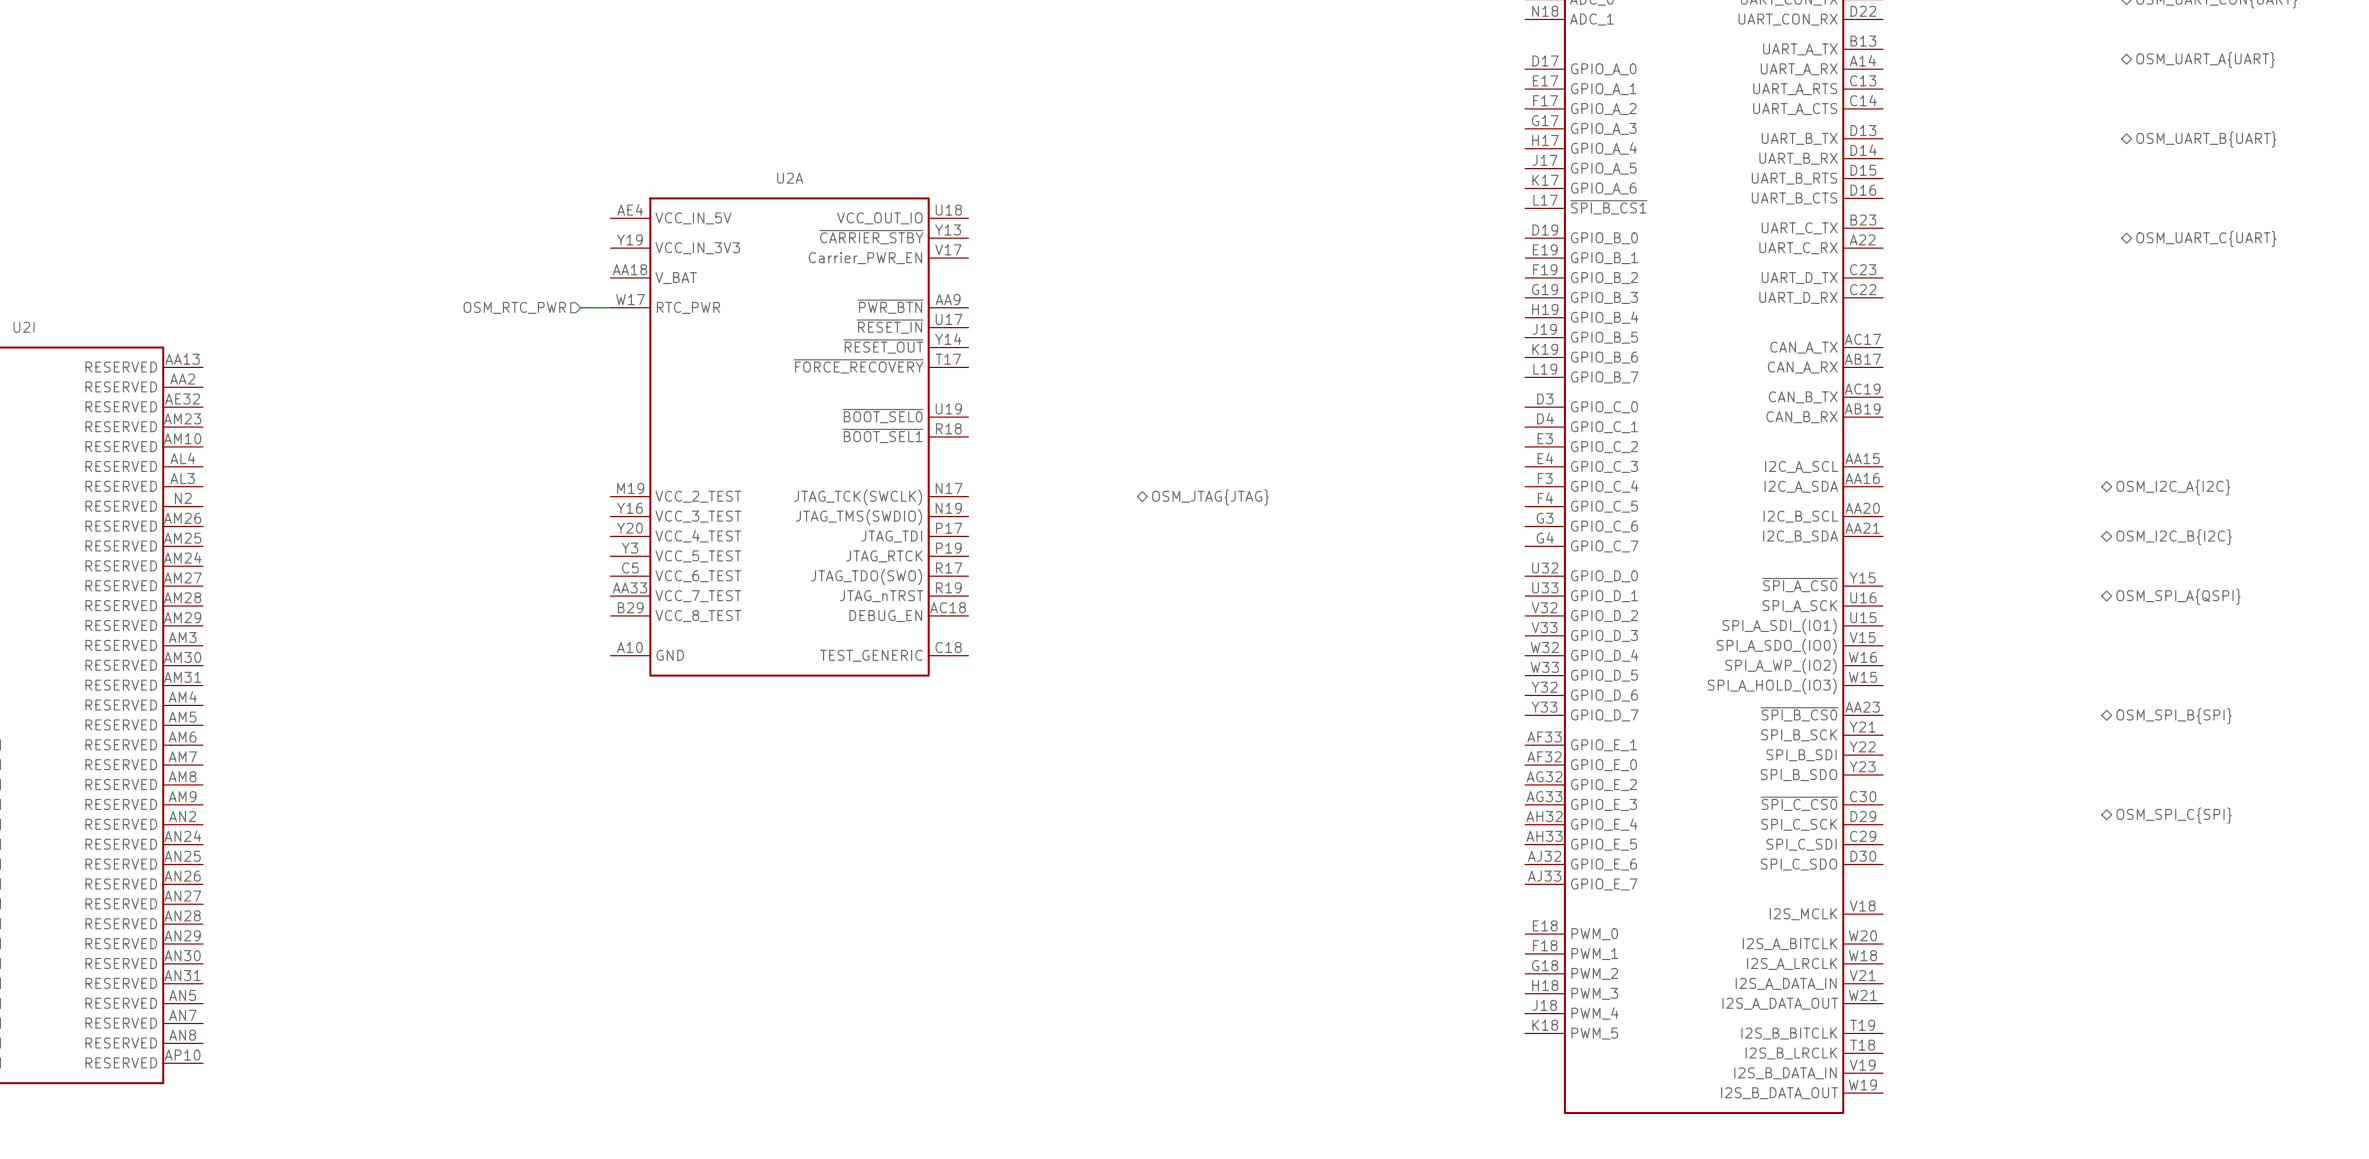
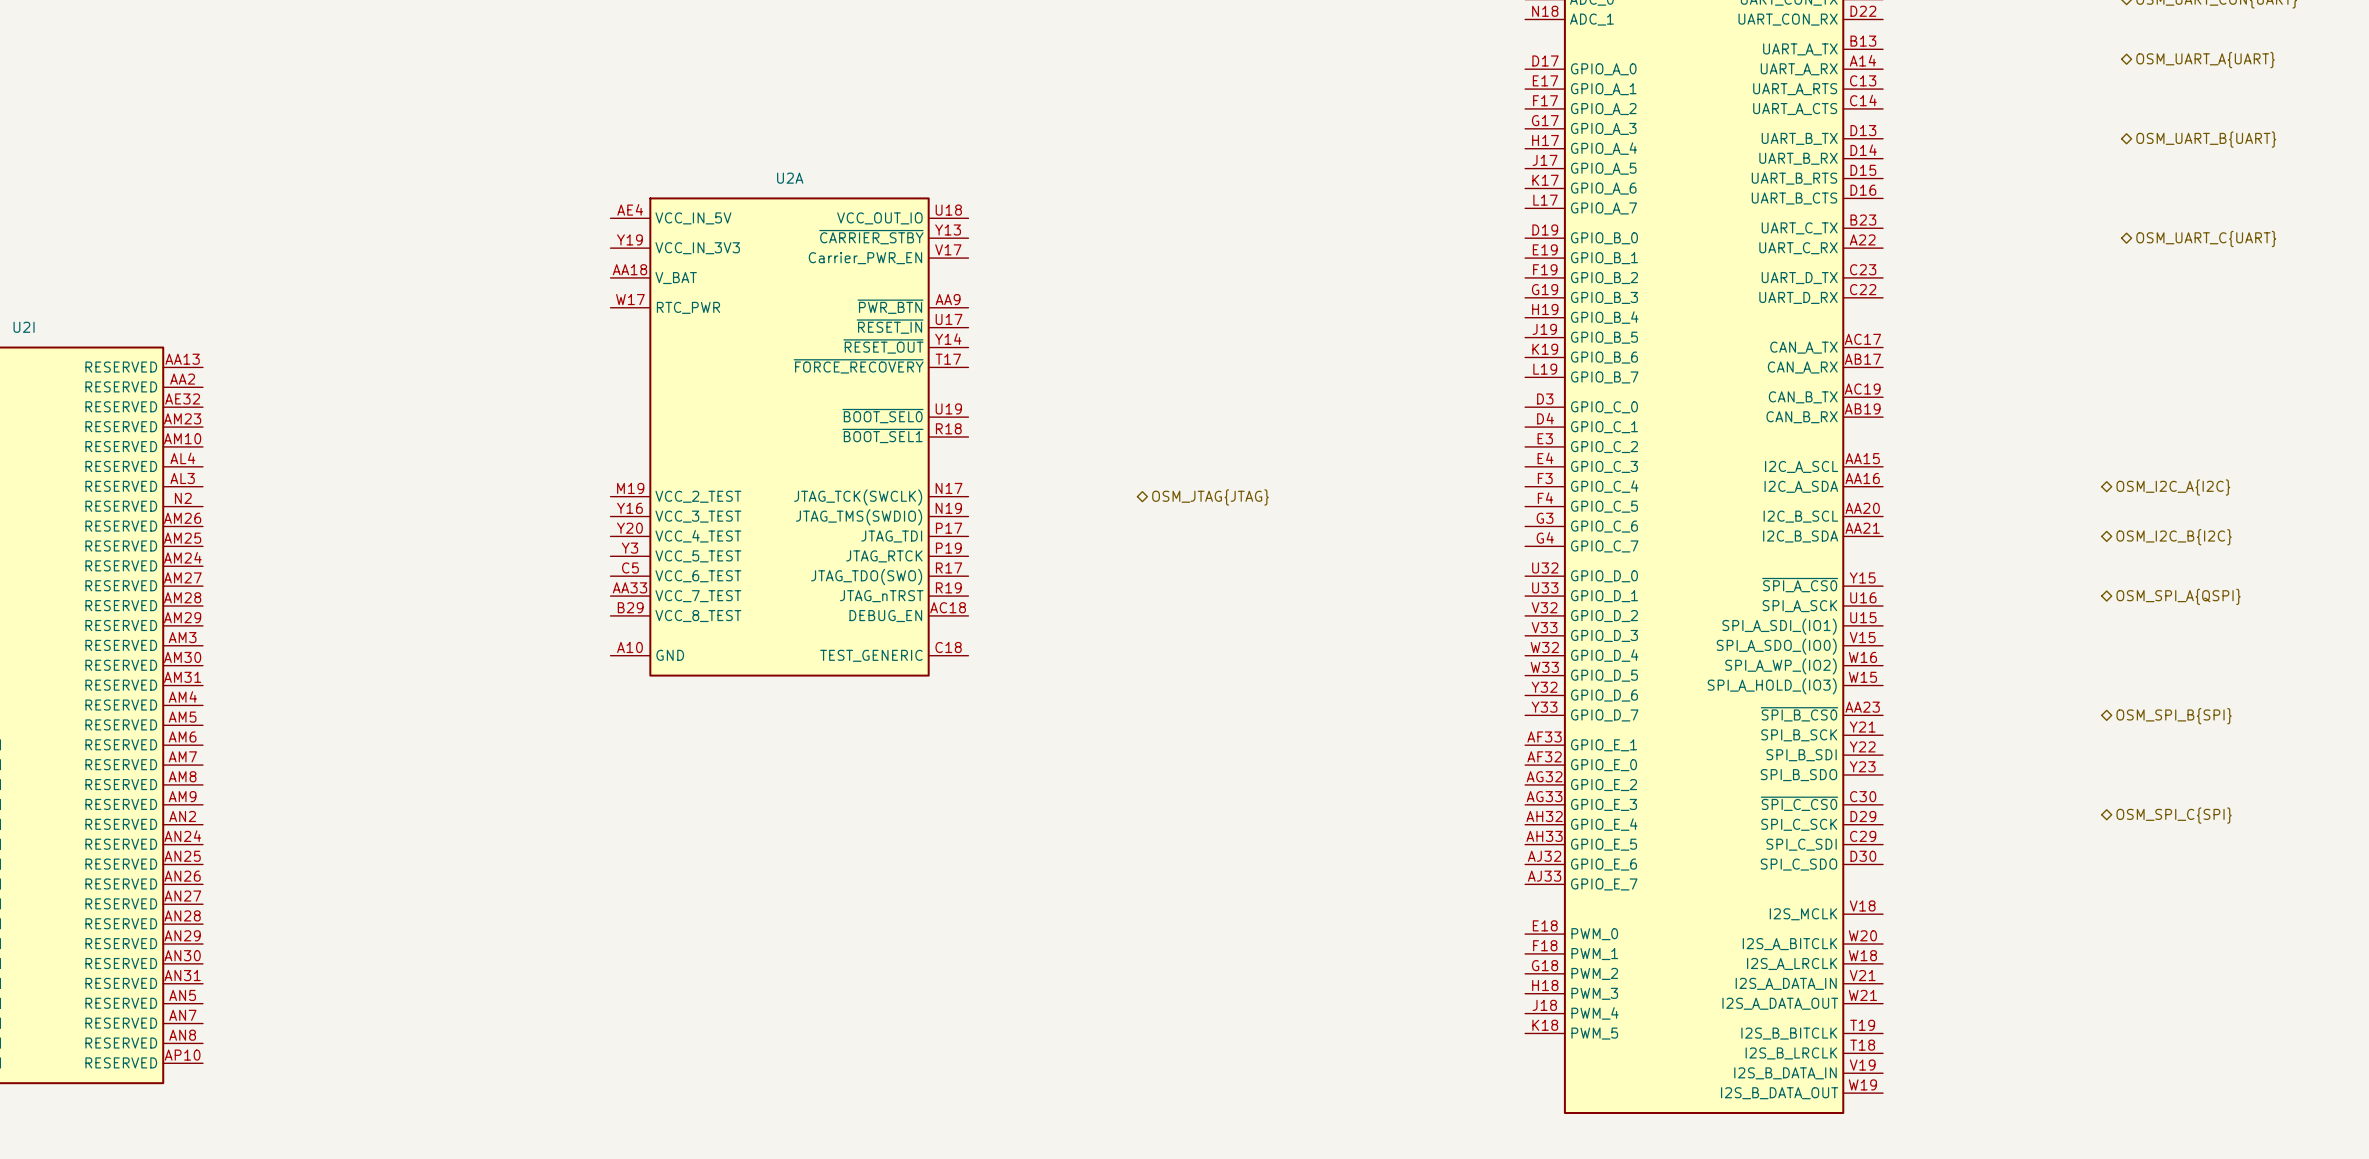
part pin name: ~{SPI_B_CS1} (1608, 207) -> GPIO_A_7 (1603, 208)
hierarchical label: OSM_RTC_PWR (514, 307) -> none
wire: (580, 307) (610, 307) -> none

